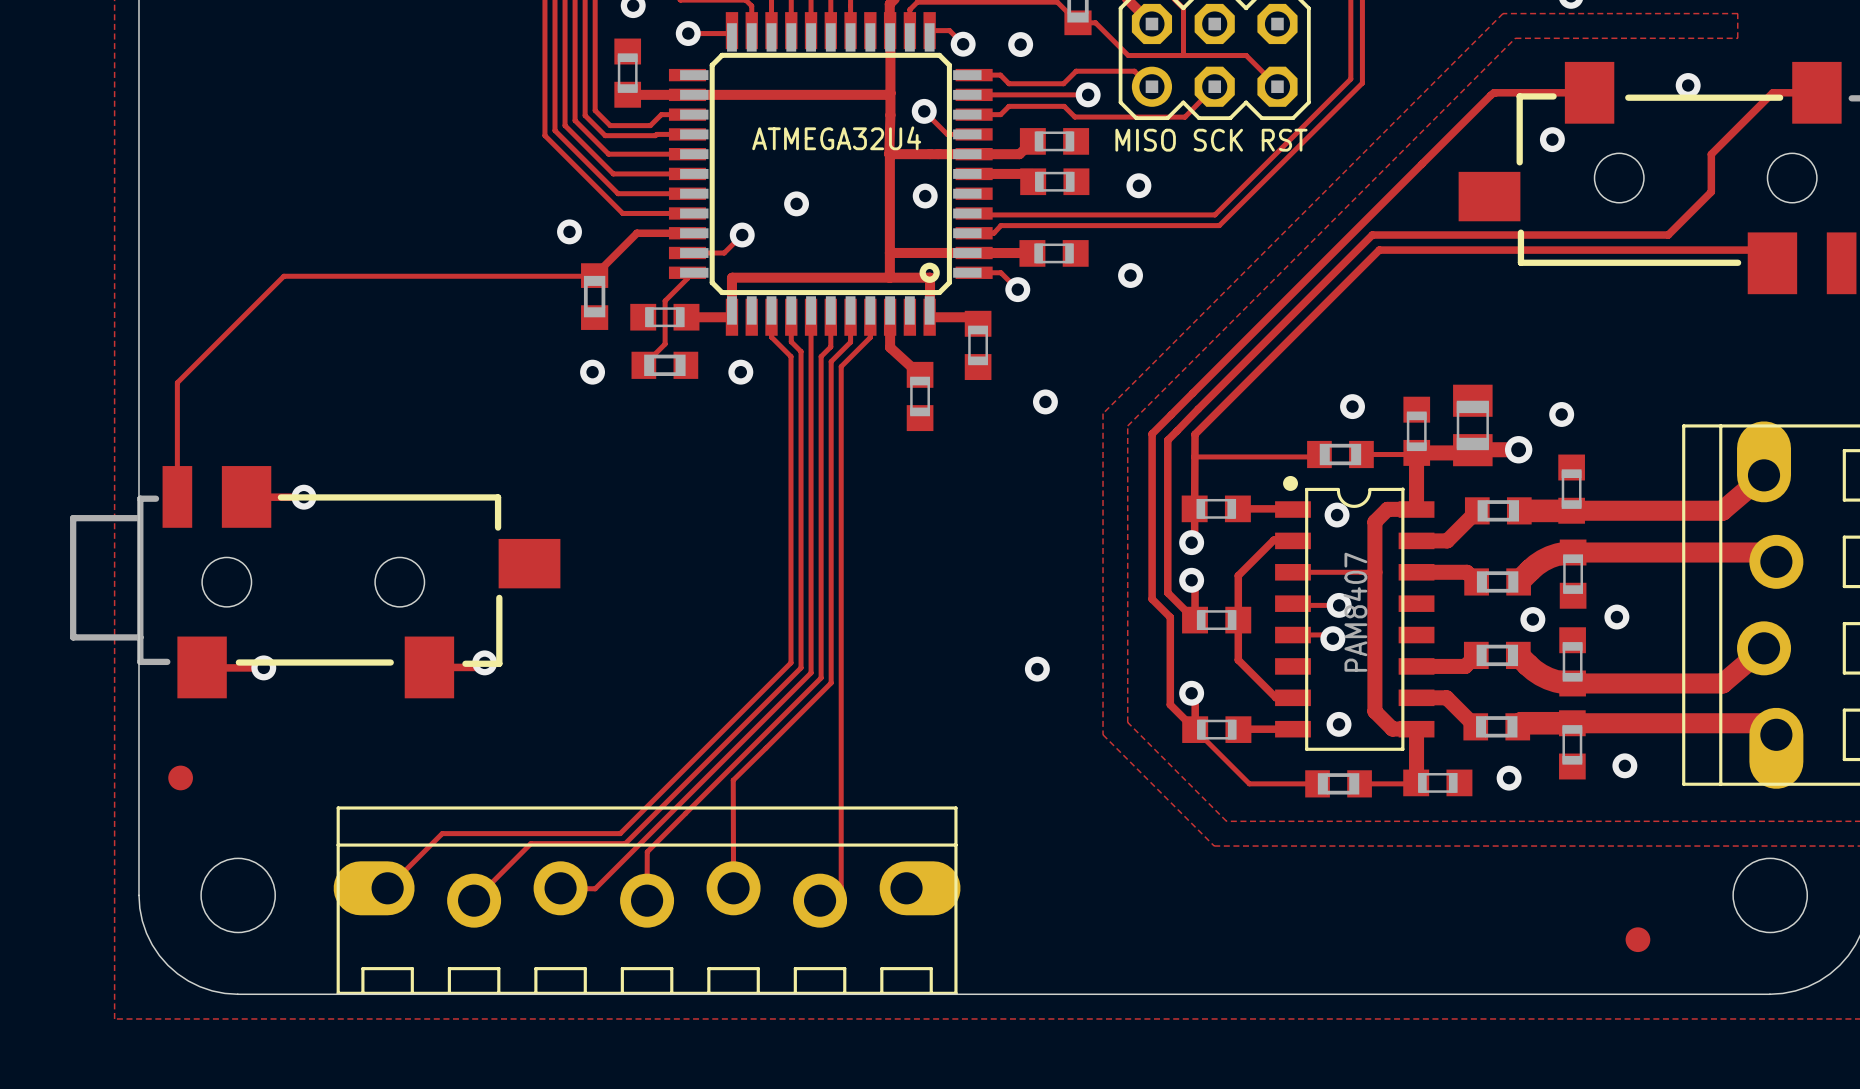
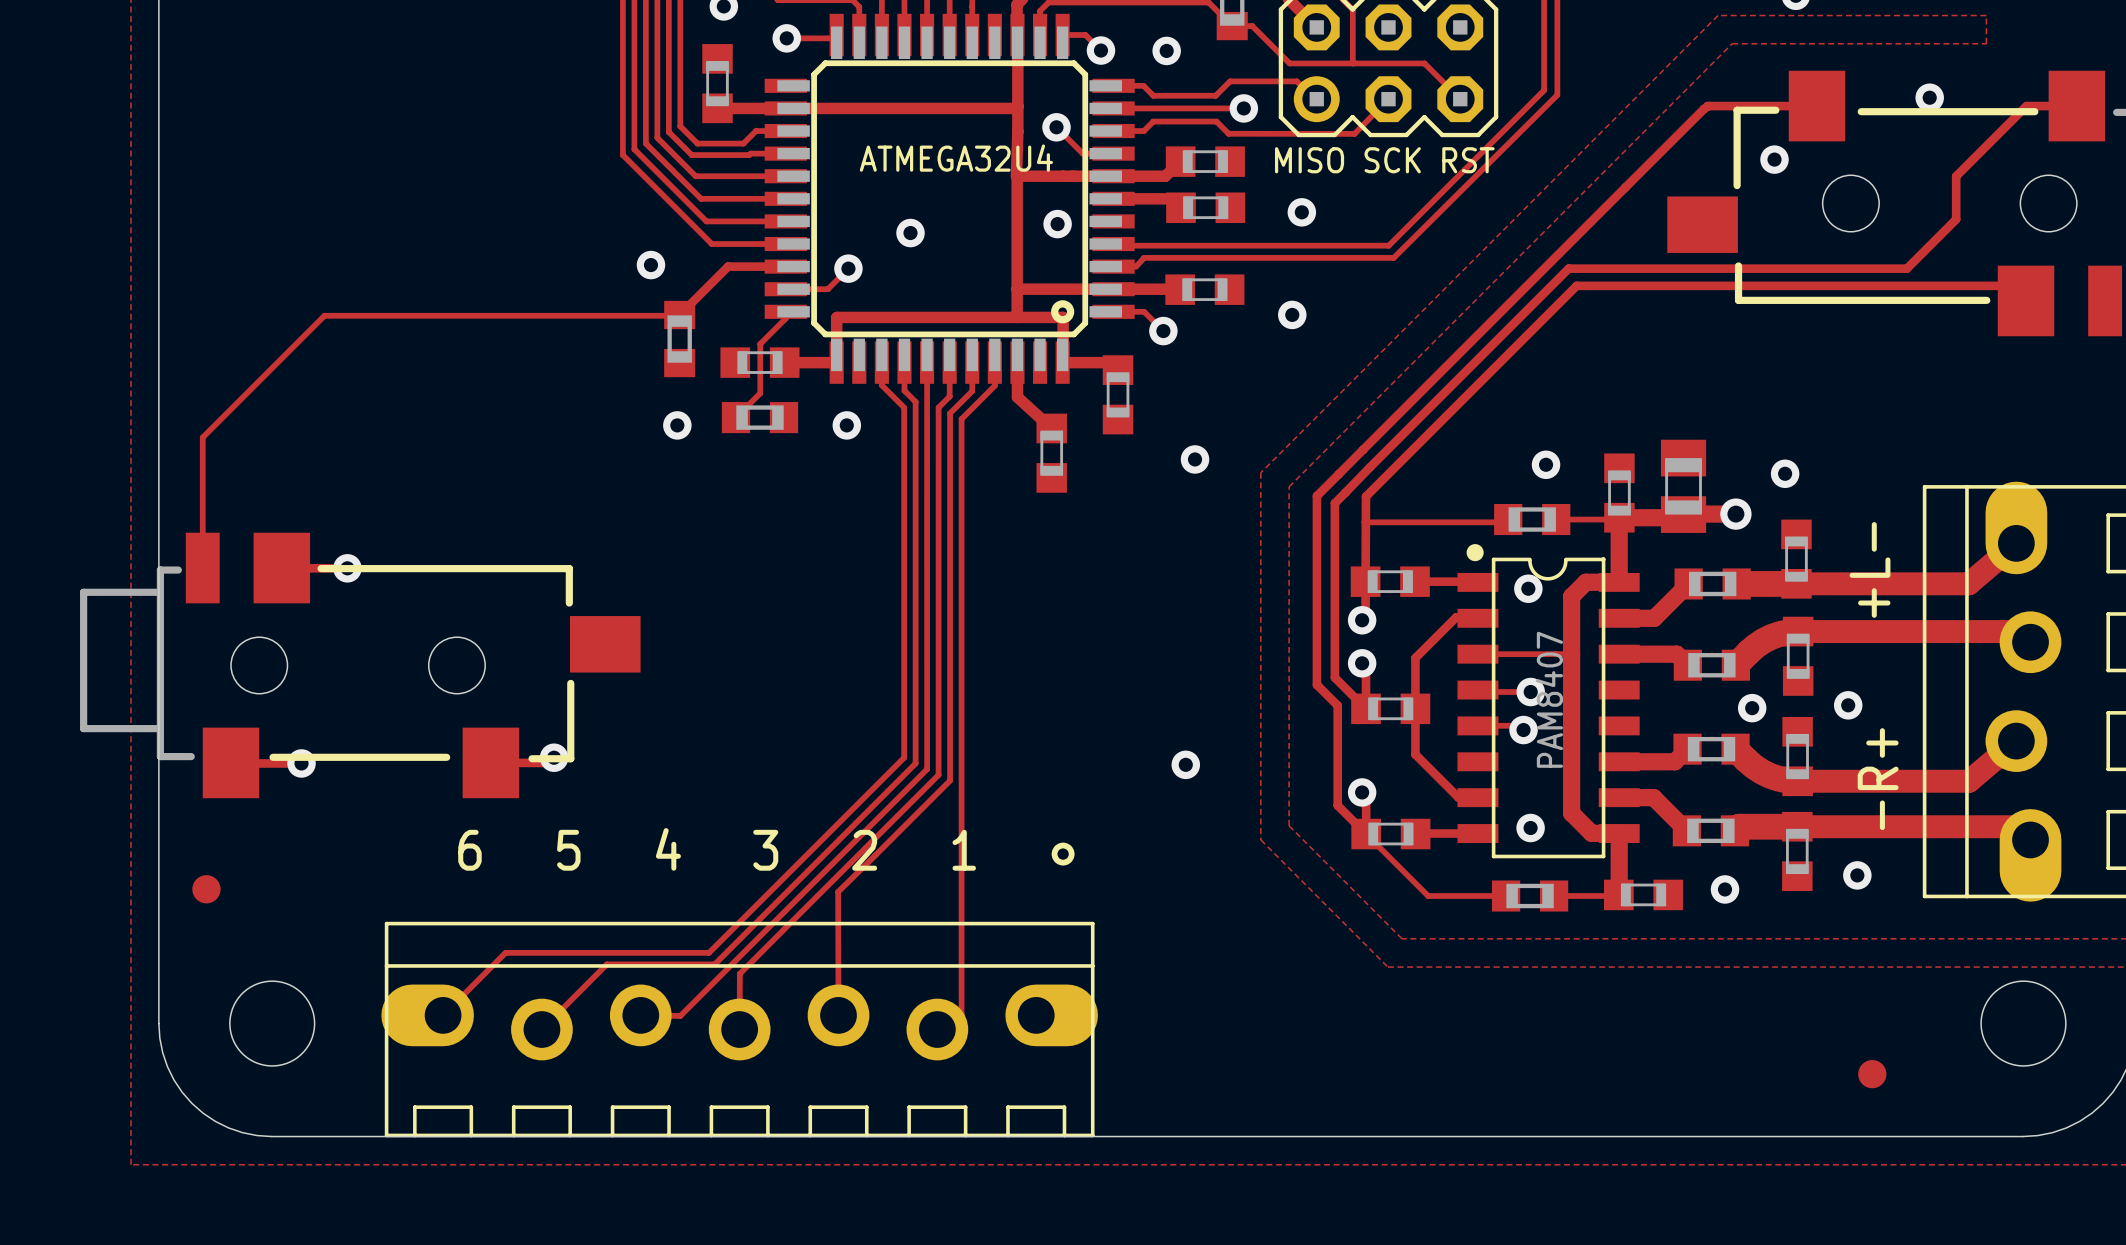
text: none -> +L- (1870, 569)
text: none -> -R+ (1878, 779)
drawing: none -> [1051, 842, 1075, 866]
text: none -> 6 (469, 850)
text: none -> 5 (568, 850)
text: none -> 4 (668, 849)
text: none -> 3 (765, 850)
text: none -> 2 (864, 850)
text: none -> 1 (964, 850)

